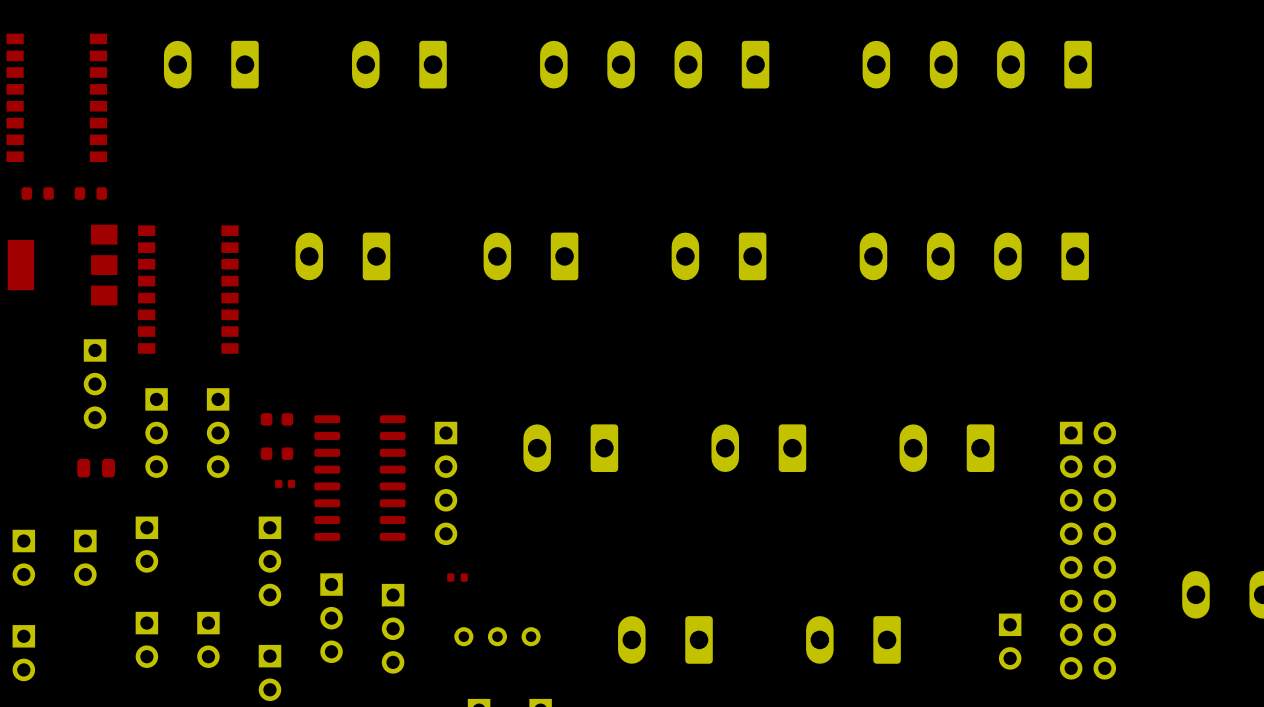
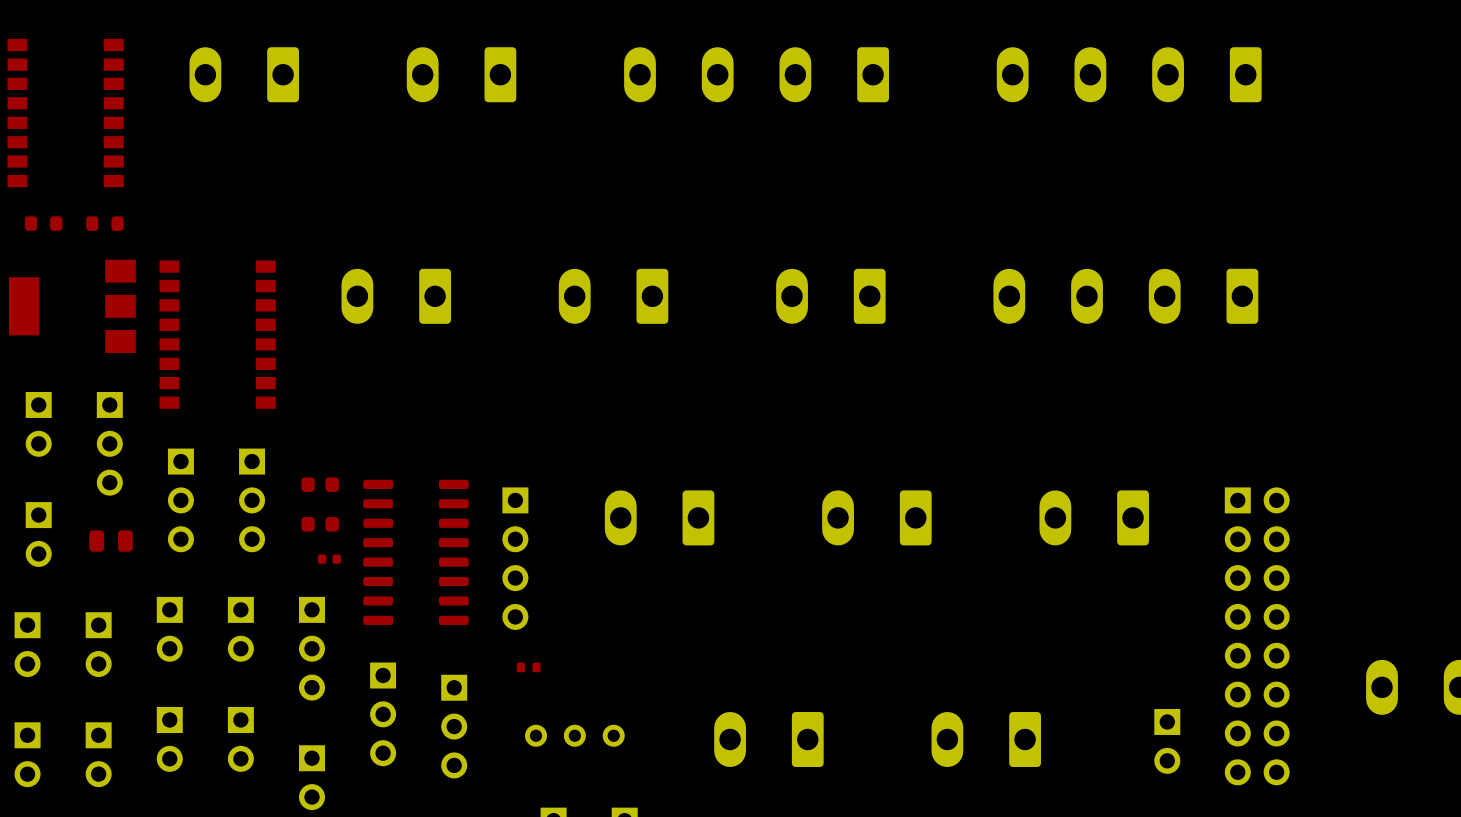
part: none -> (38, 424)
part: none -> (38, 534)
part: none -> (240, 629)
part: none -> (98, 754)

